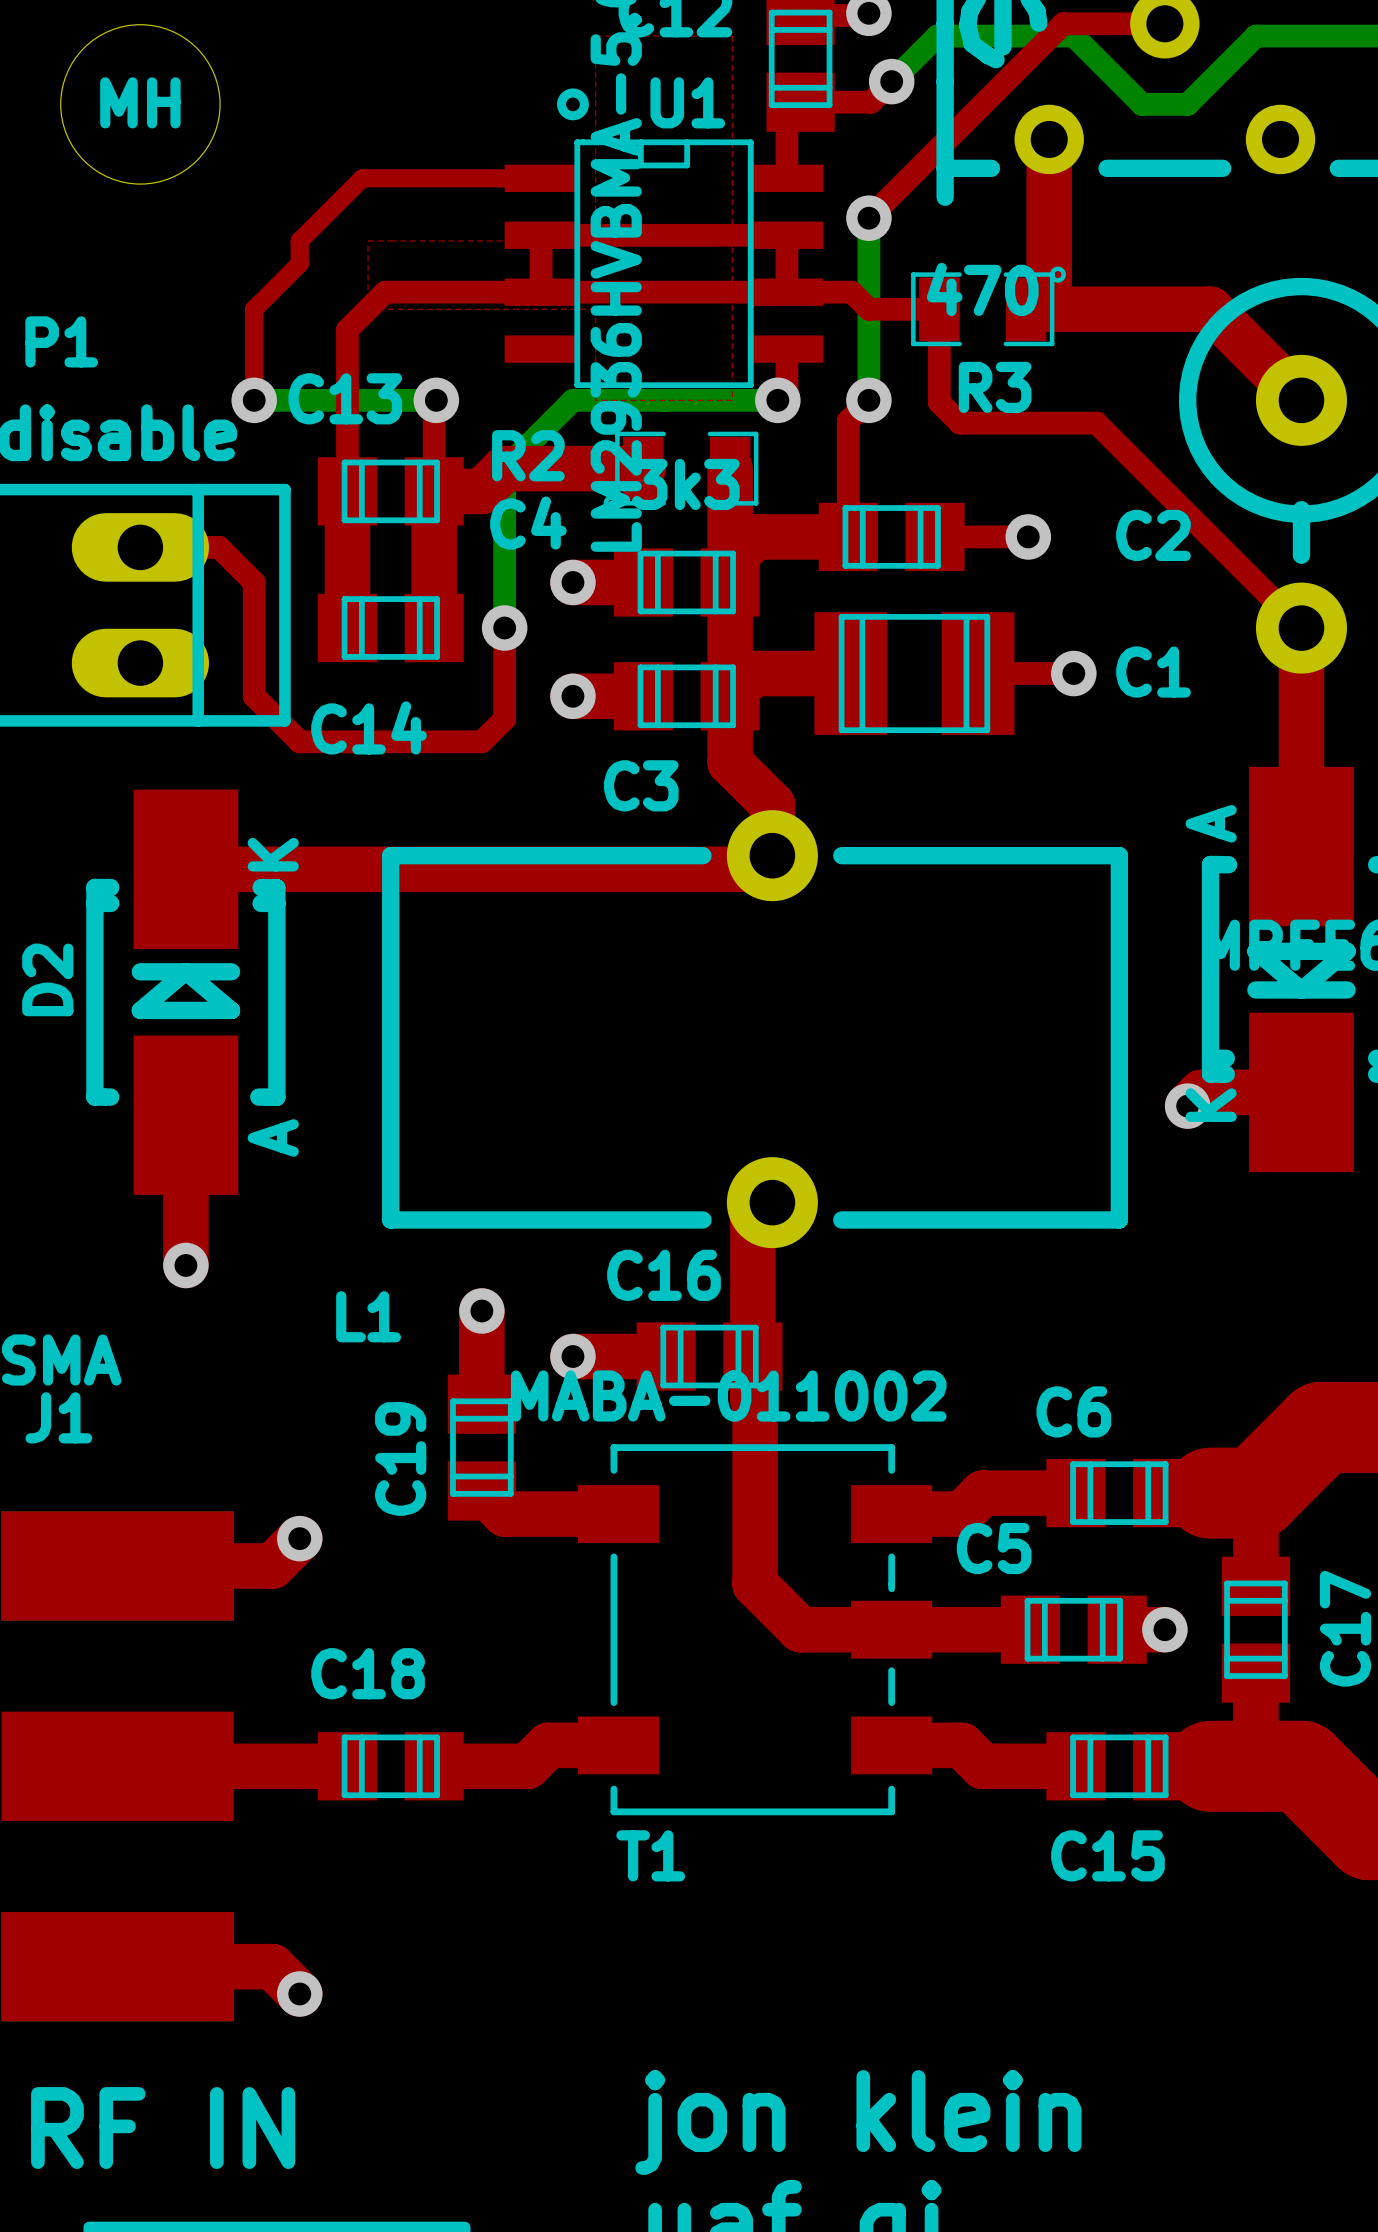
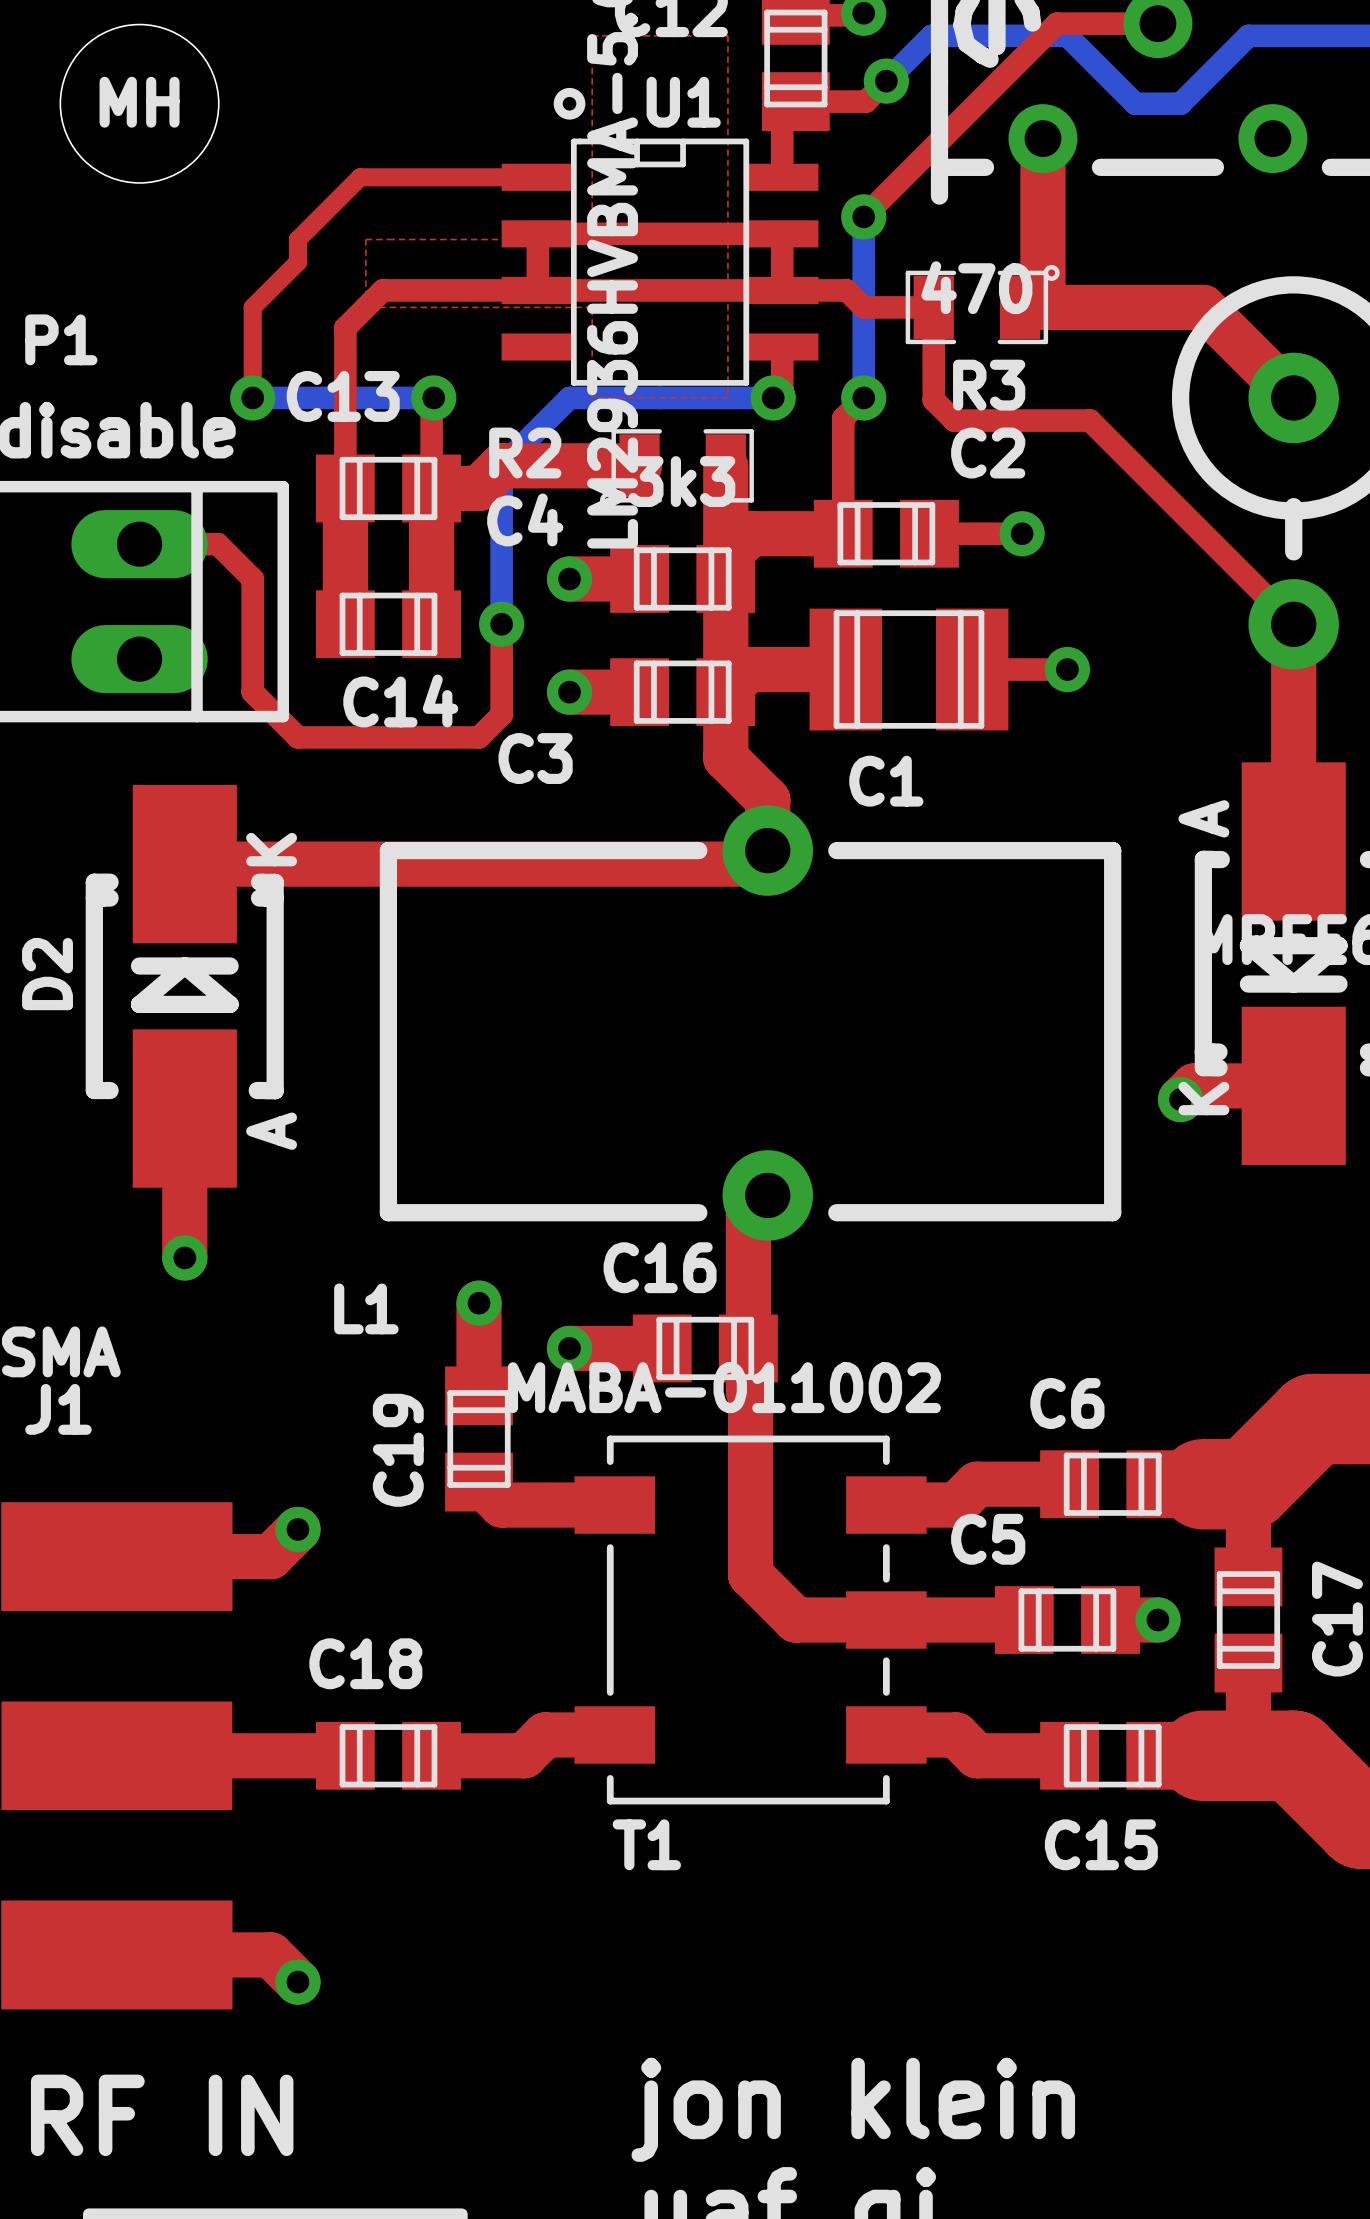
C2 name position: C2 (1153, 535) -> C2 (988, 453)
C1 name position: C1 (1153, 672) -> C1 (886, 781)
C14 name position: C14 (369, 727) -> C14 (400, 700)
C3 name position: C3 (641, 785) -> C3 (535, 758)

